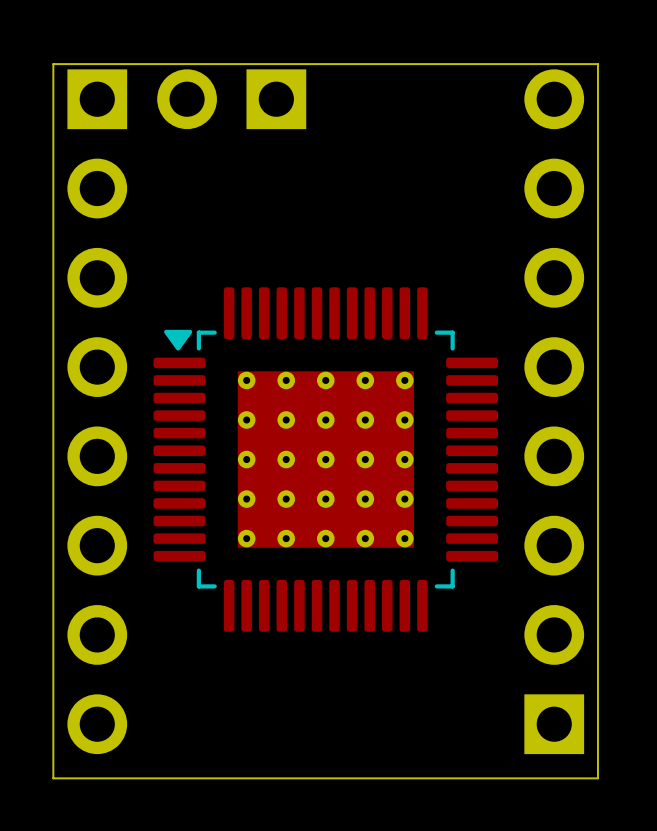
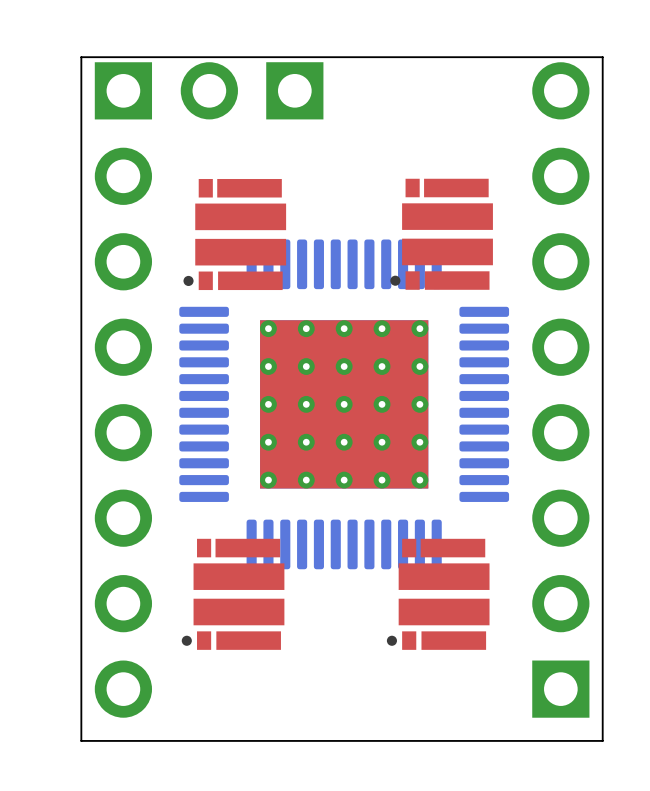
part: none -> (234, 234)
part: none -> (441, 234)
part side: top (325, 459) -> bottom (344, 404)
part: none -> (233, 594)
part: none -> (438, 594)

